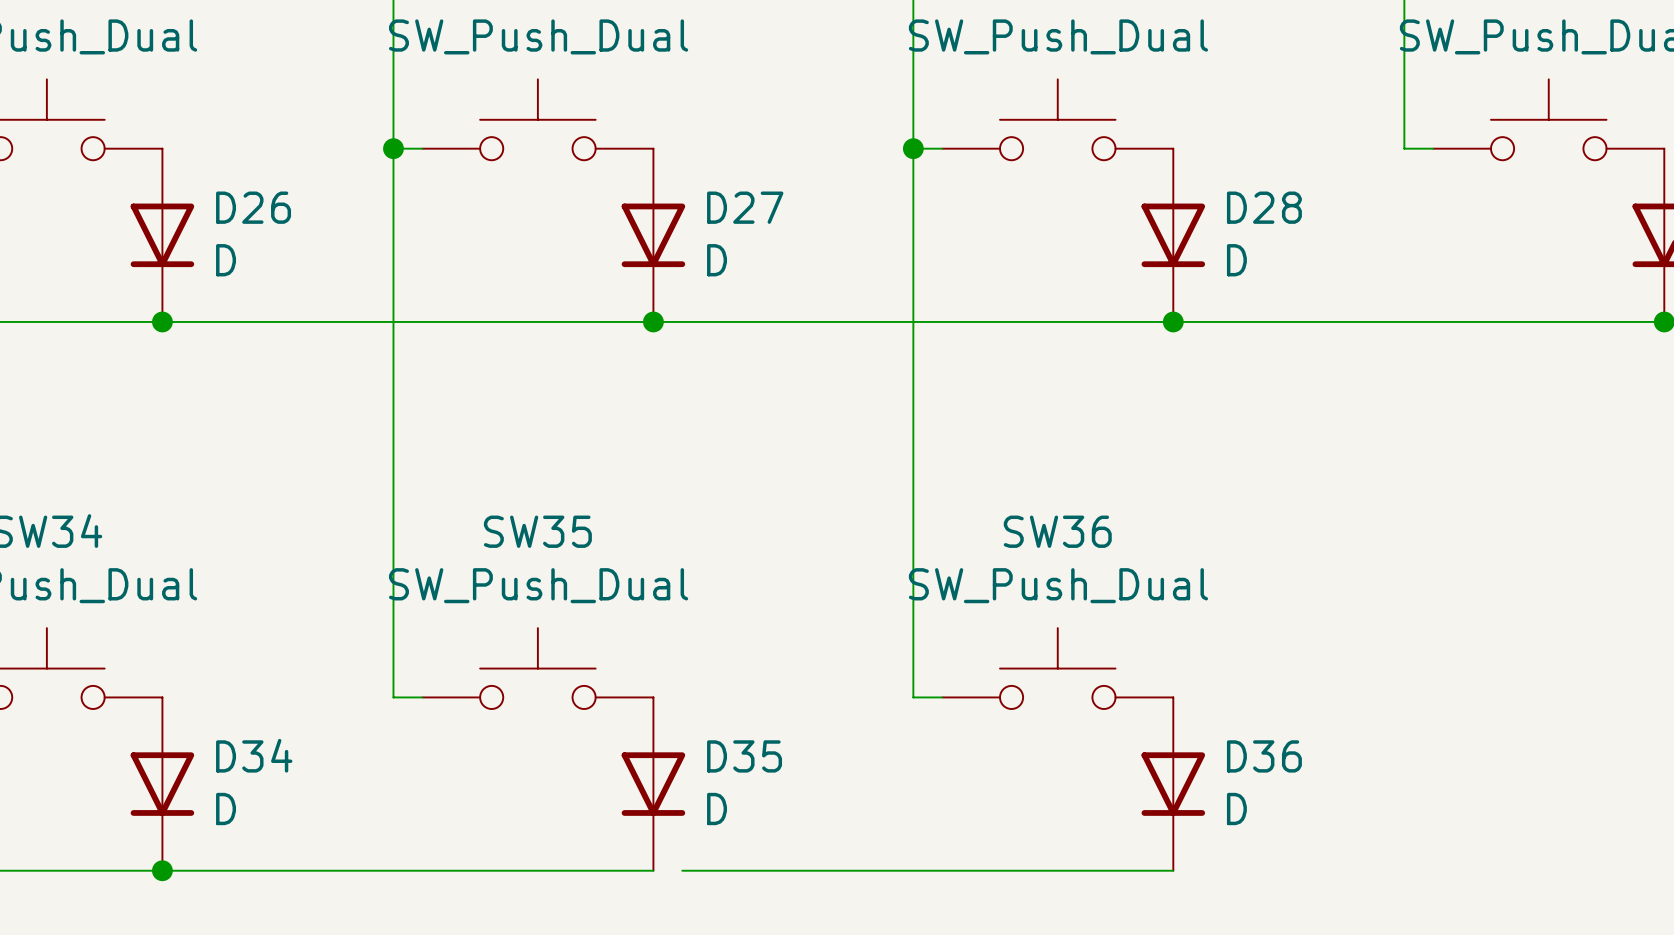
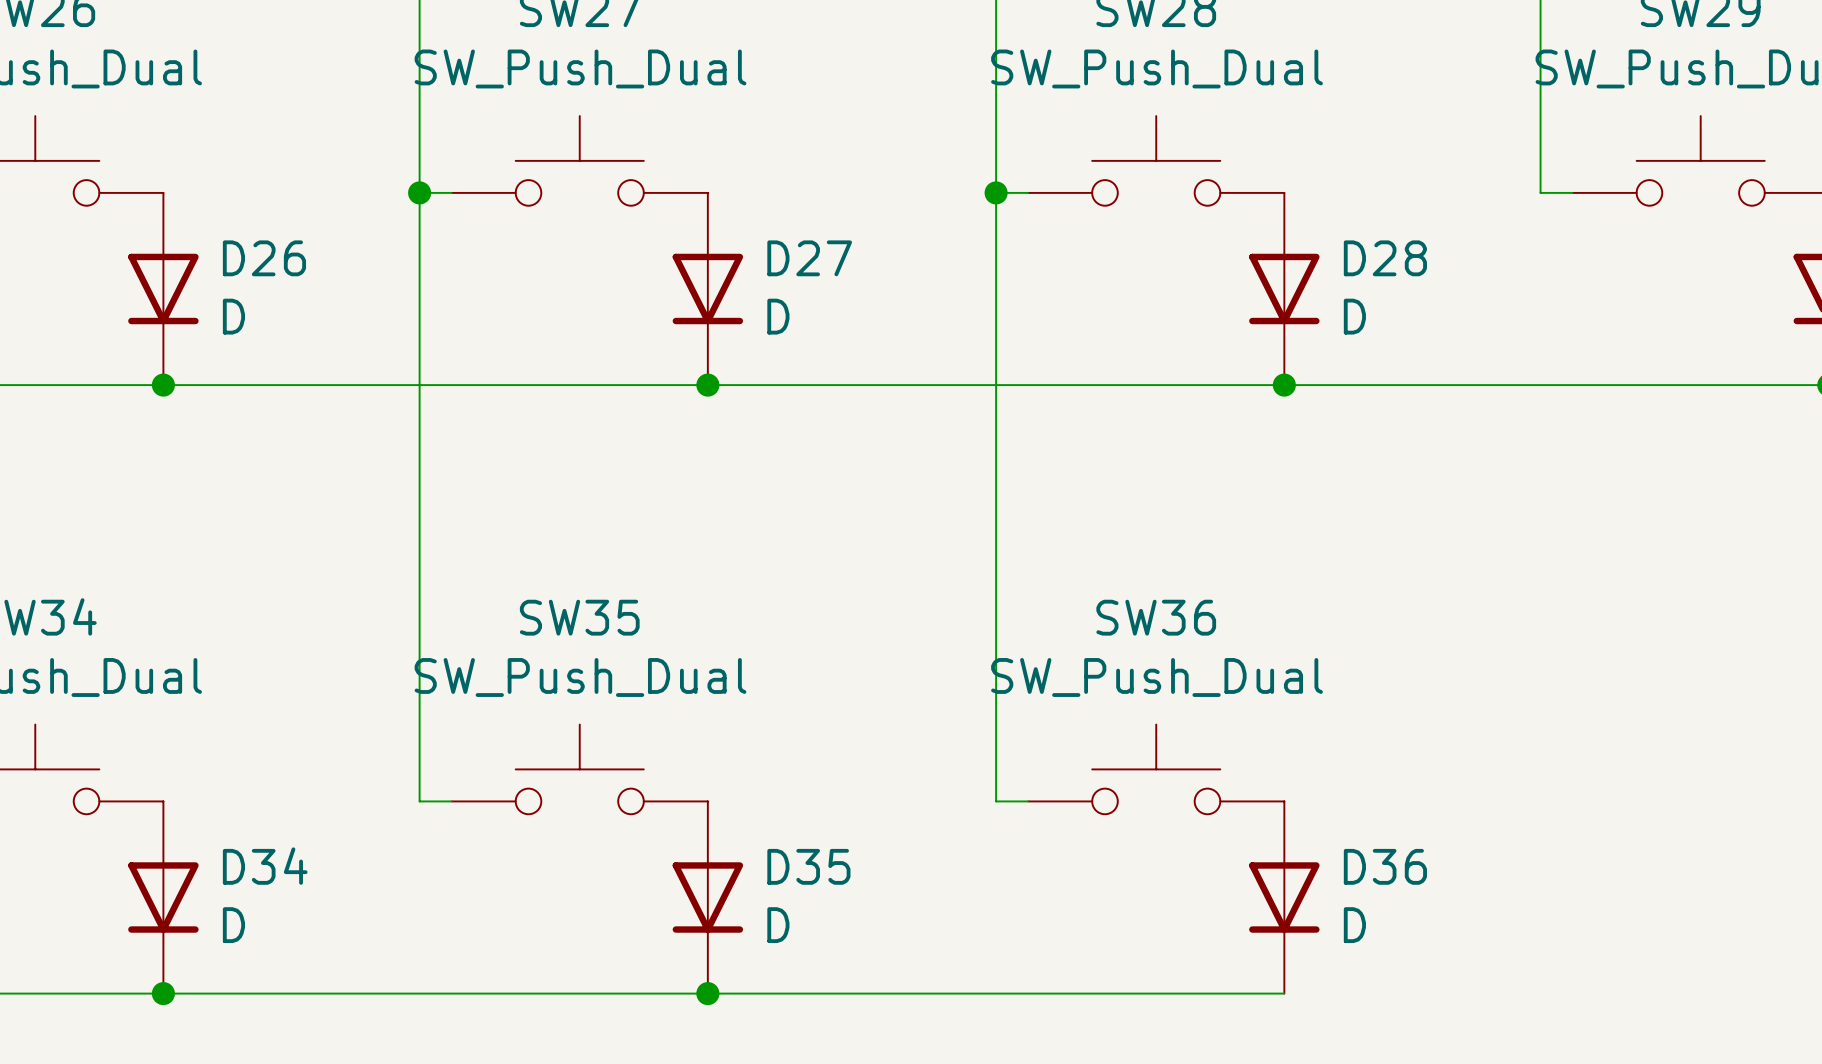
wire: none -> (707, 993) (739, 993)
junction: none -> (707, 993)

